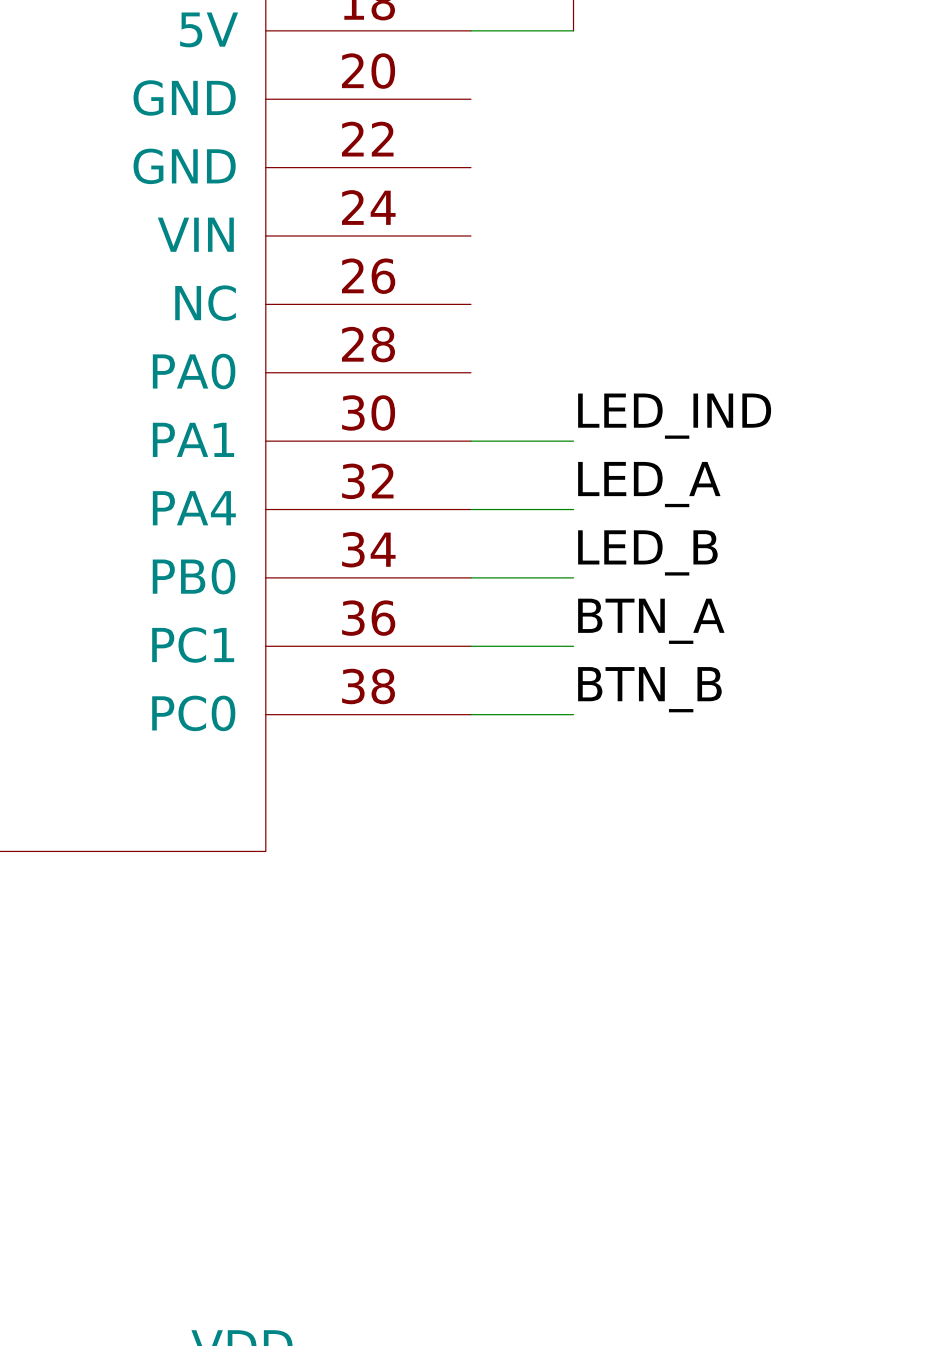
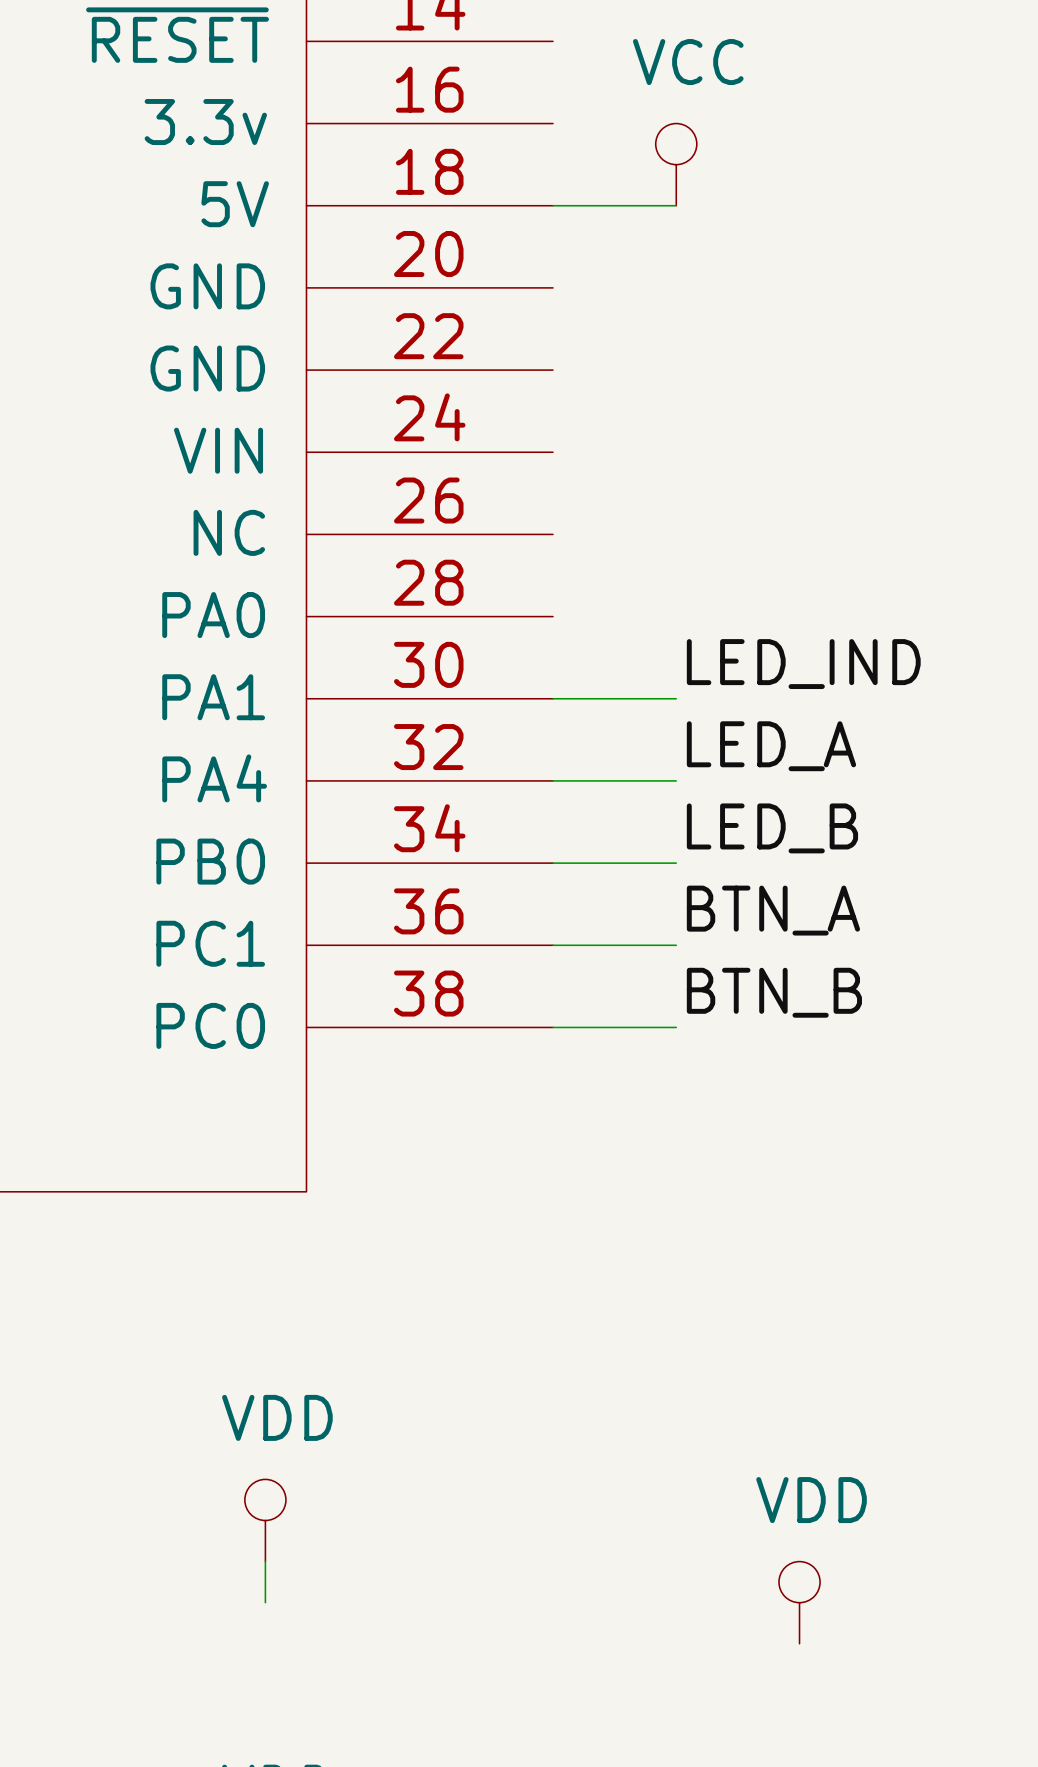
power symbol: none -> VDD (265, 1520)
wire: none -> (265, 1561) (265, 1602)
power symbol: none -> VDD (799, 1602)

